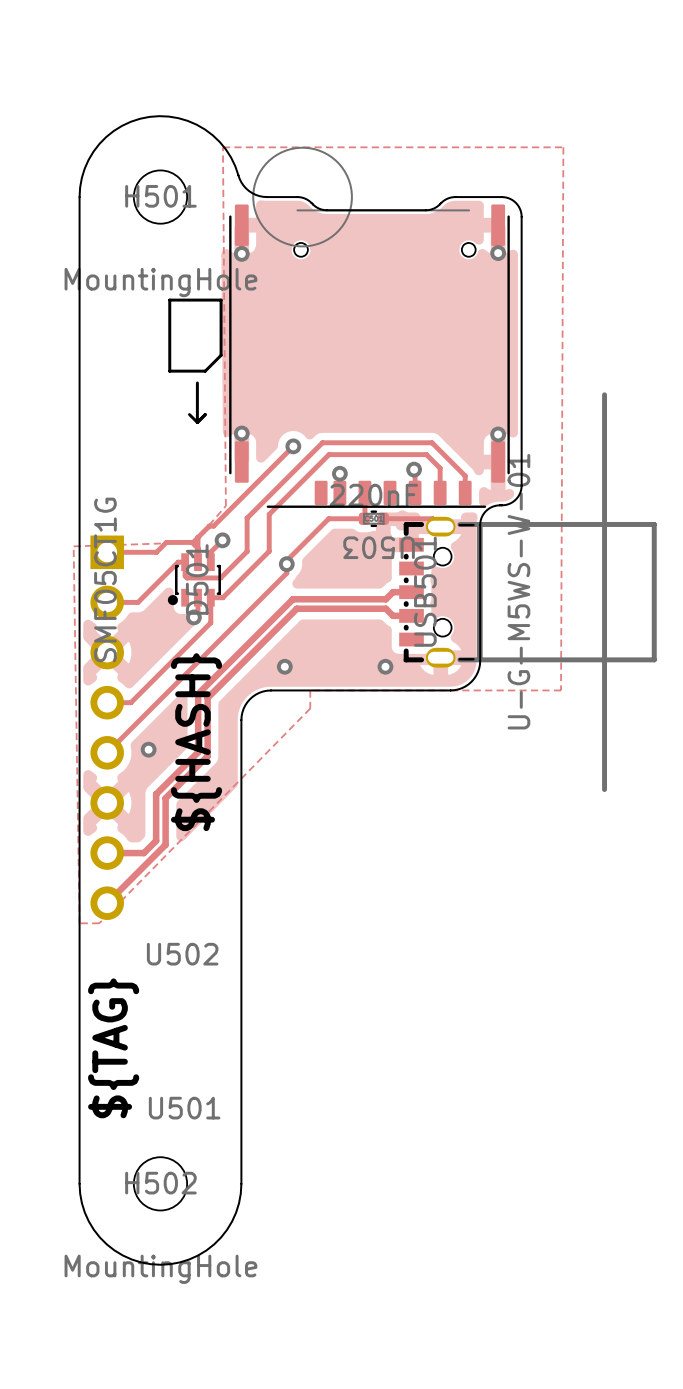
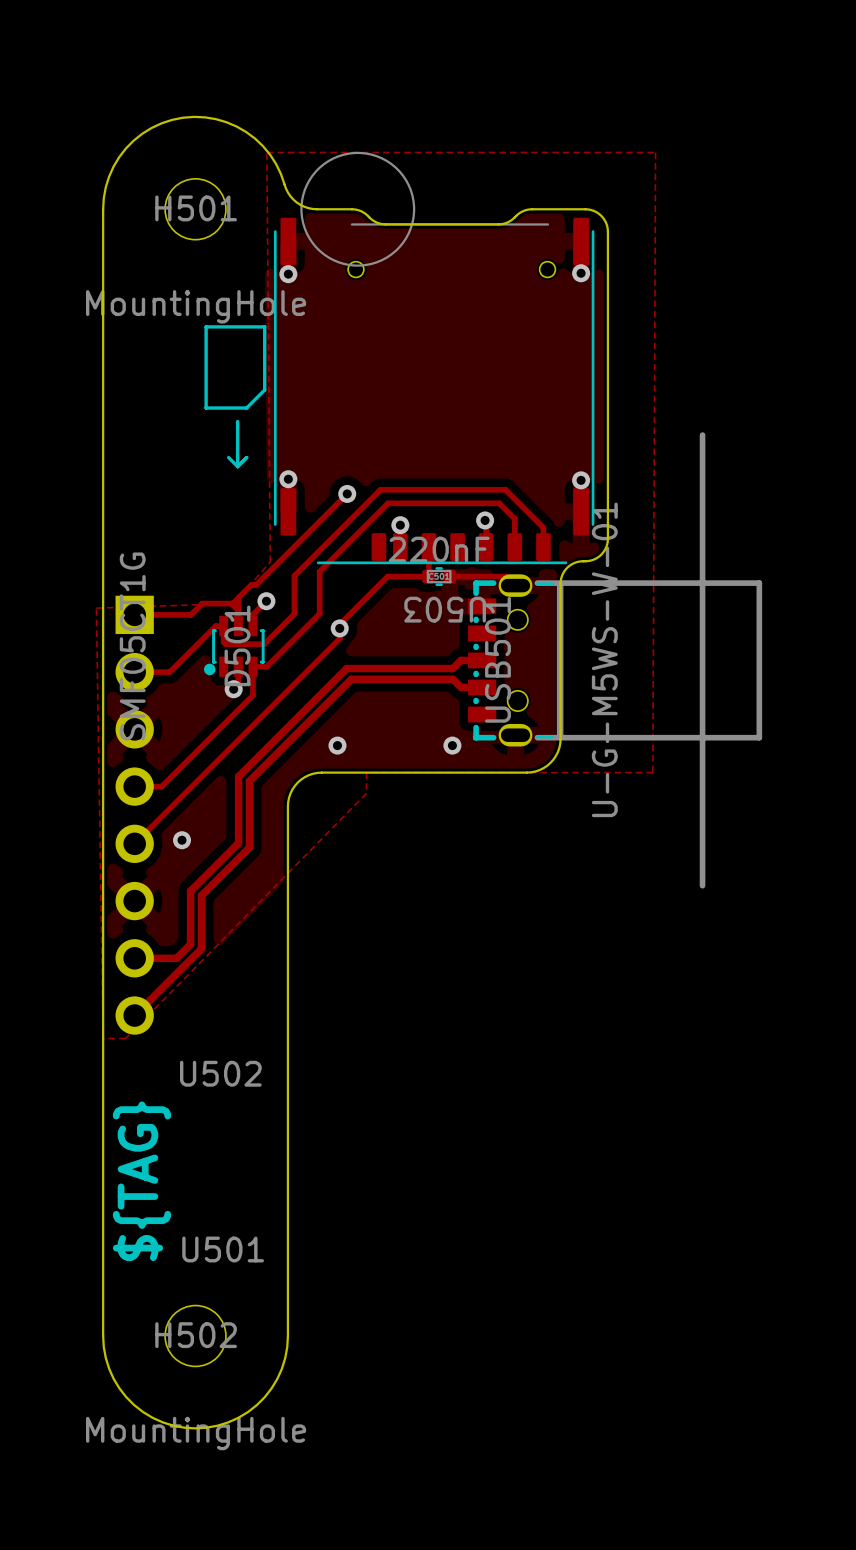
text: ${HASH} (196, 742) -> none

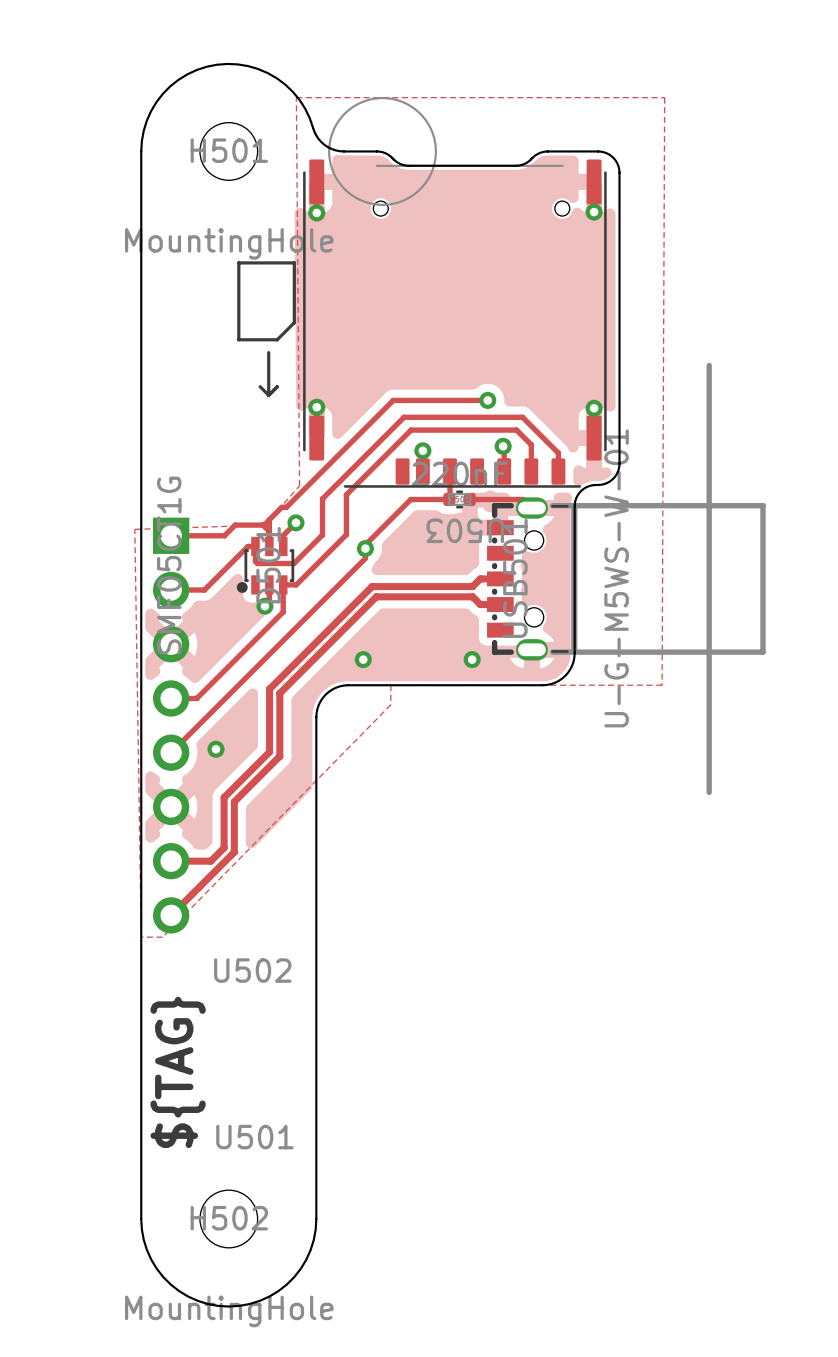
track: none -> (487, 400) (393, 400) (372, 421)
via position: (347, 493) -> (487, 400)

